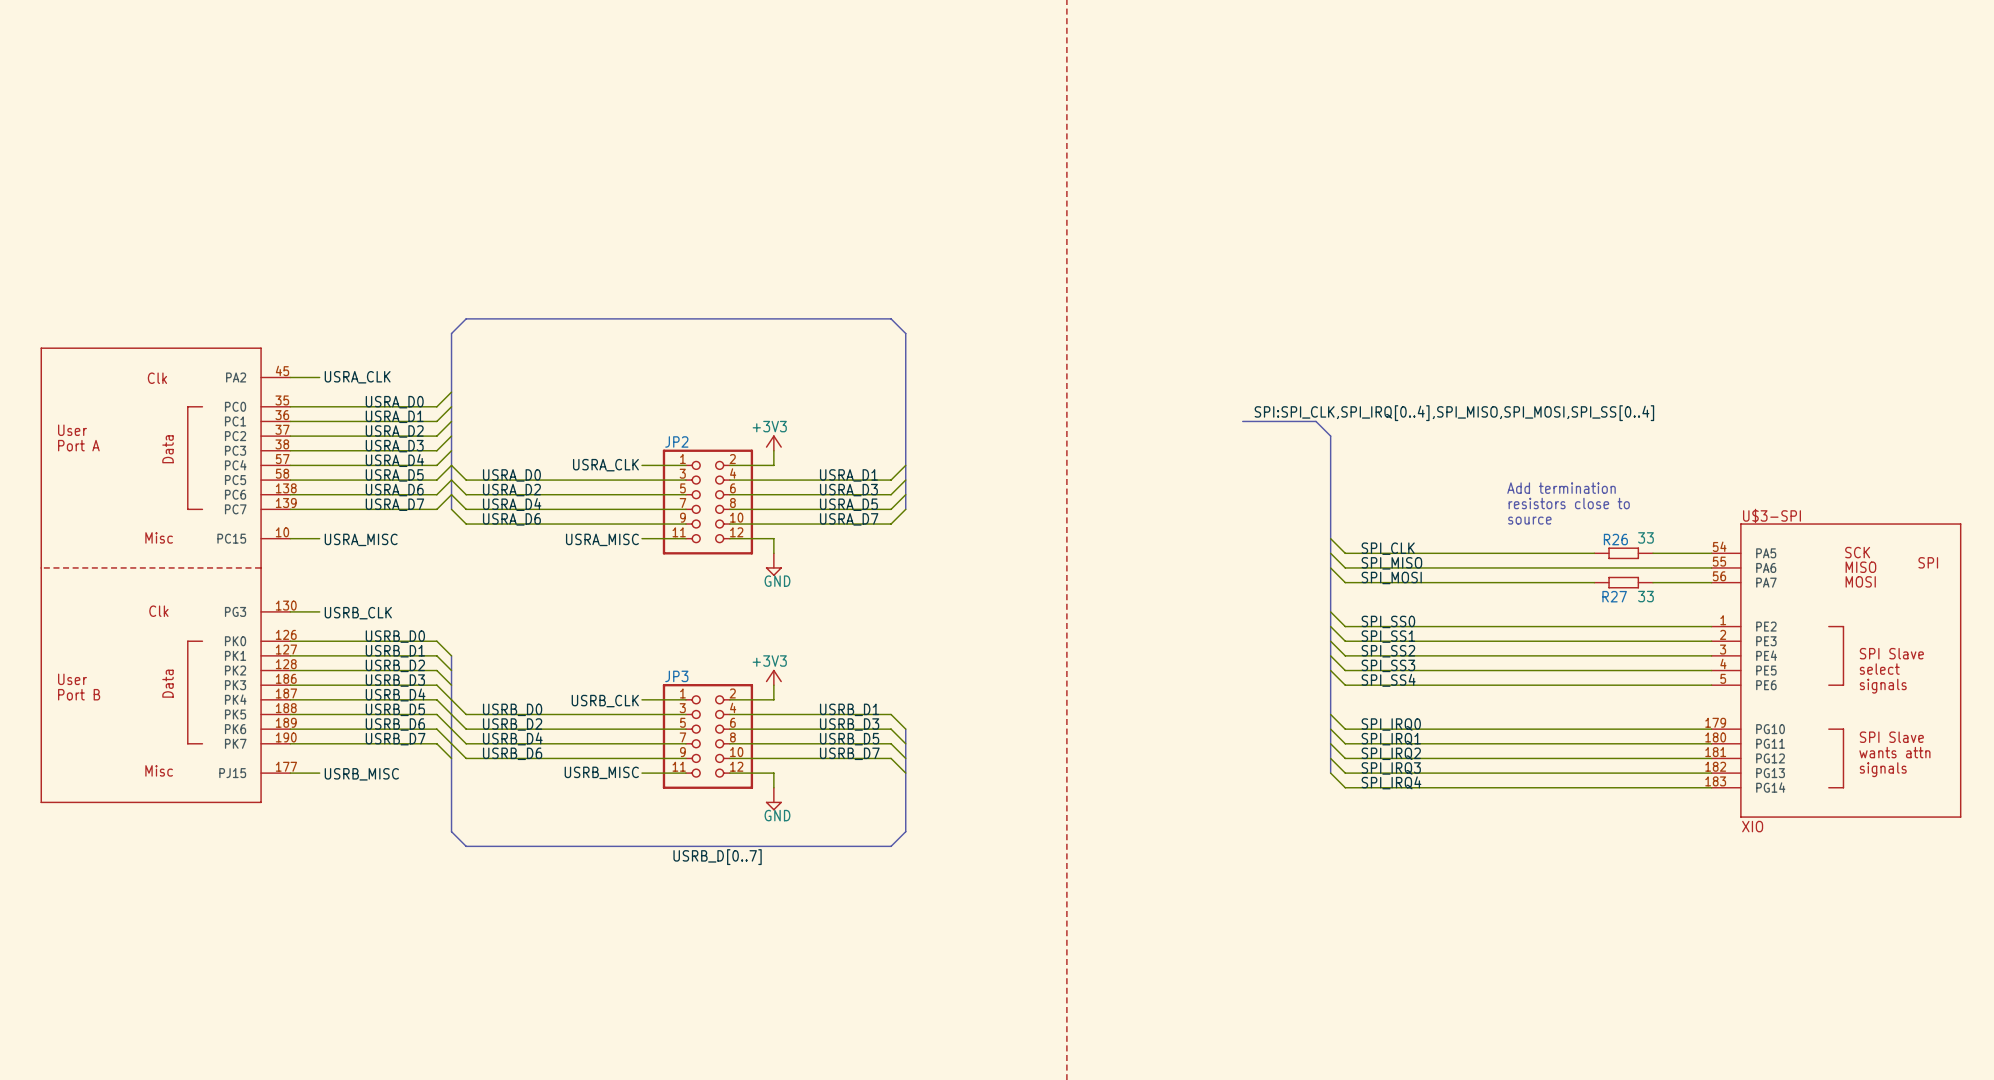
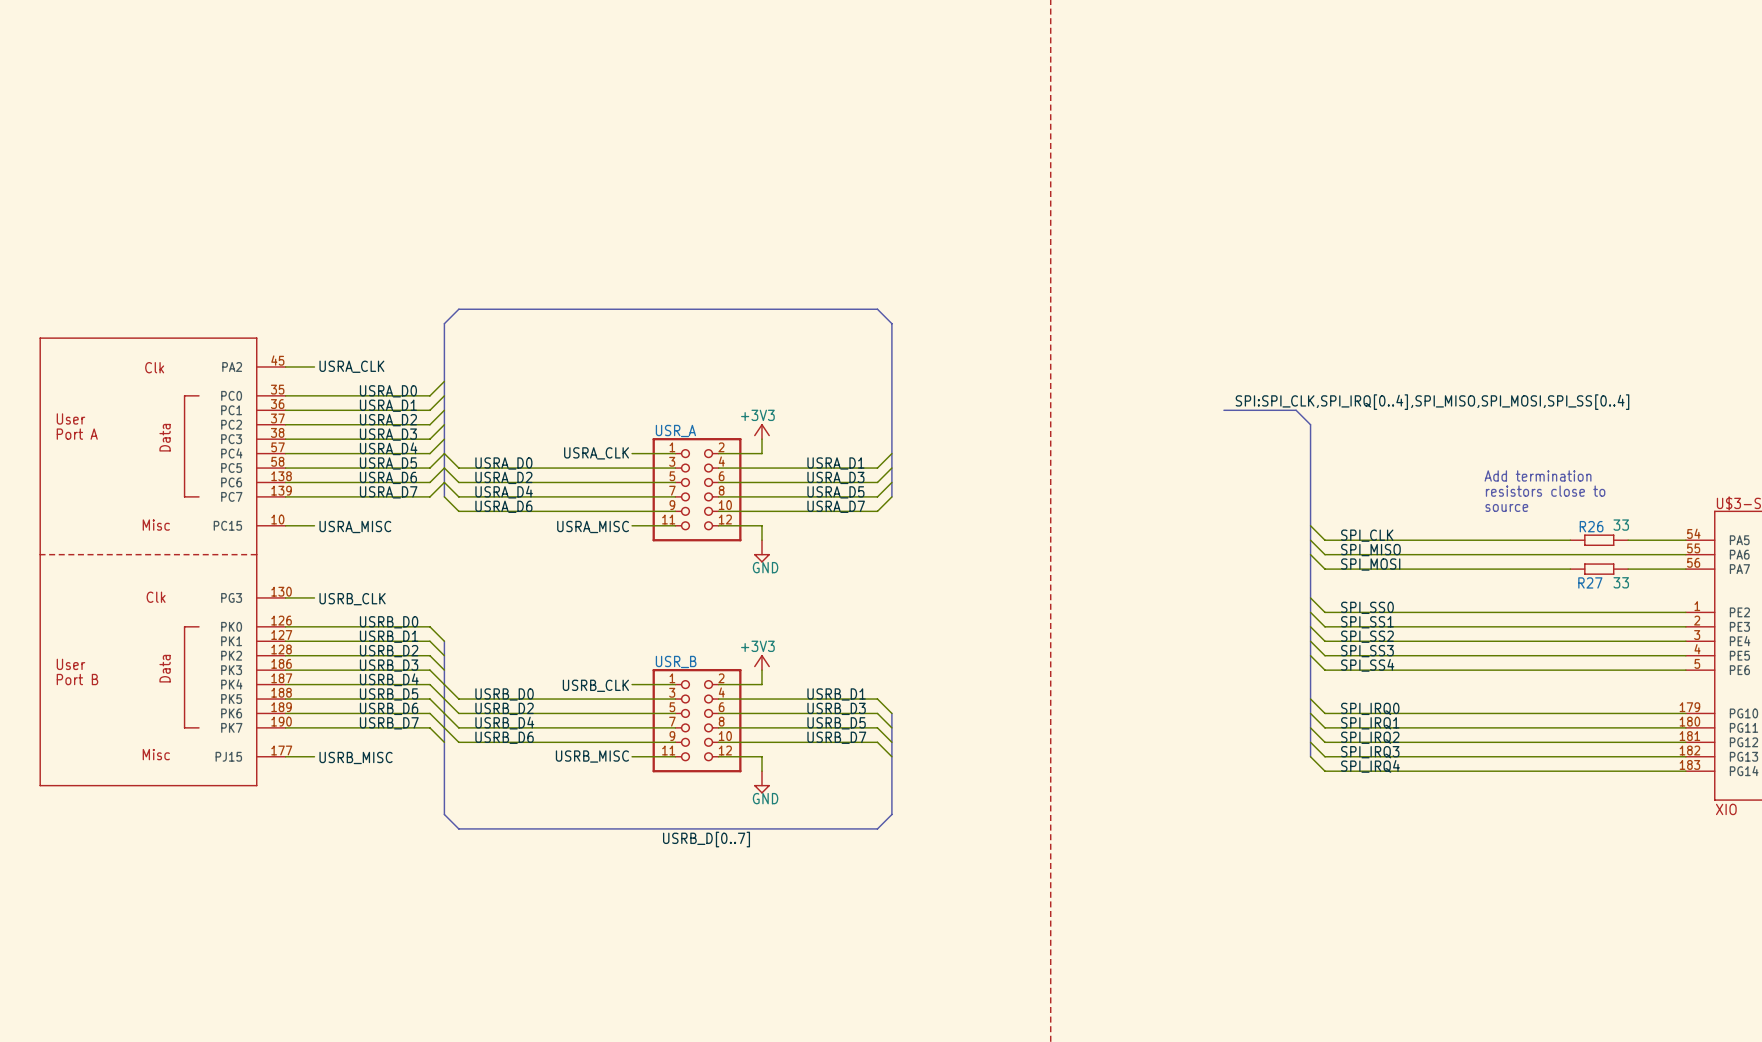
JP2 name: JP2 (676, 441) -> USR_A (675, 430)
JP3 name: JP3 (676, 676) -> USR_B (676, 661)

